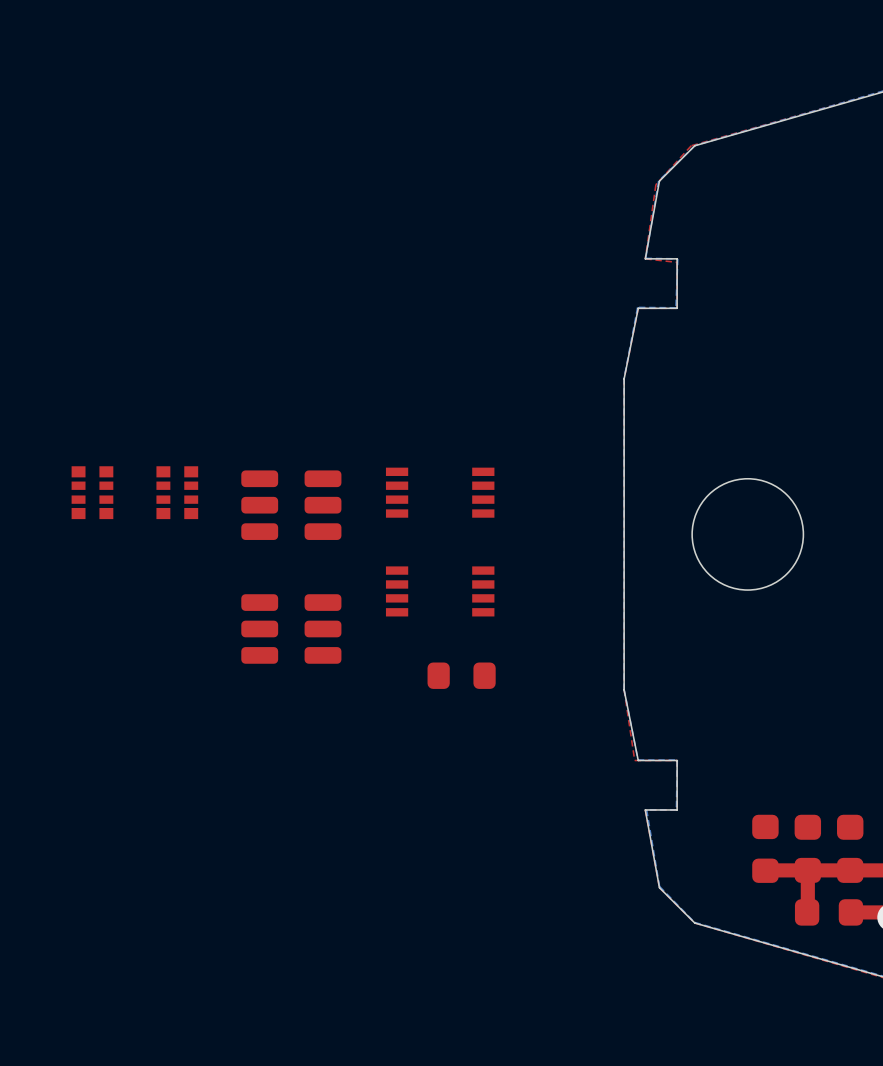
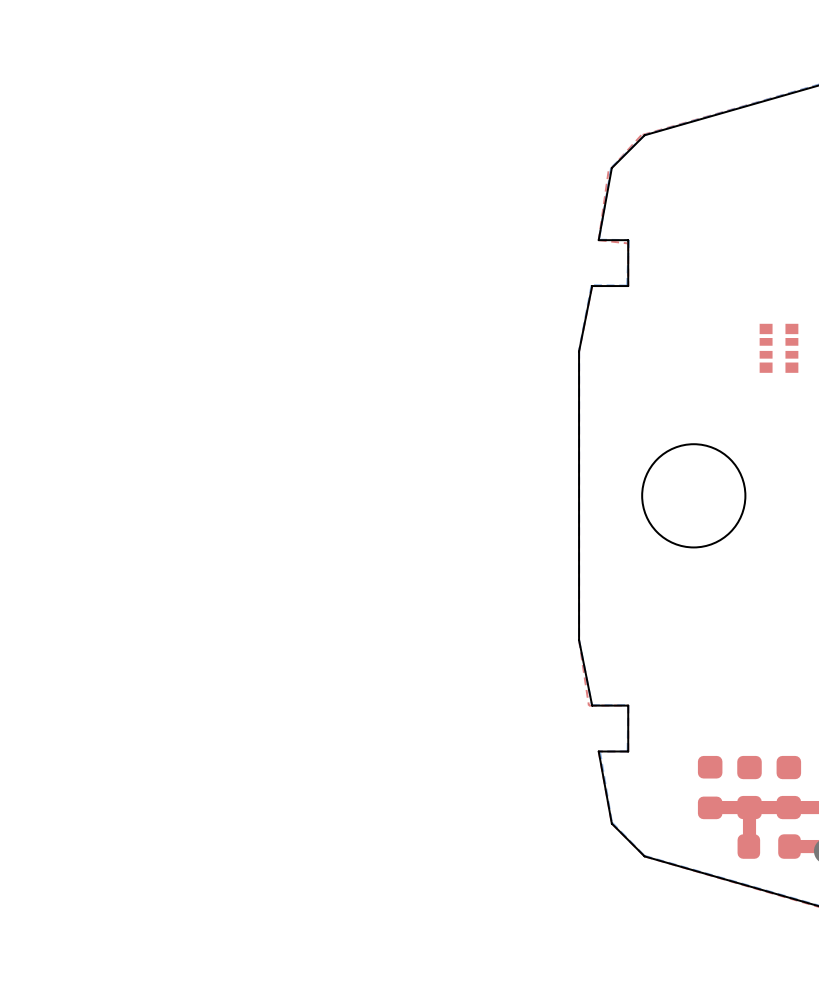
part: none -> (779, 348)
part: (92, 492) -> none
part: (177, 492) -> none
part: (440, 492) -> none
part: (291, 505) -> none
part: (440, 591) -> none
part: (291, 628) -> none
part: (461, 675) -> none

